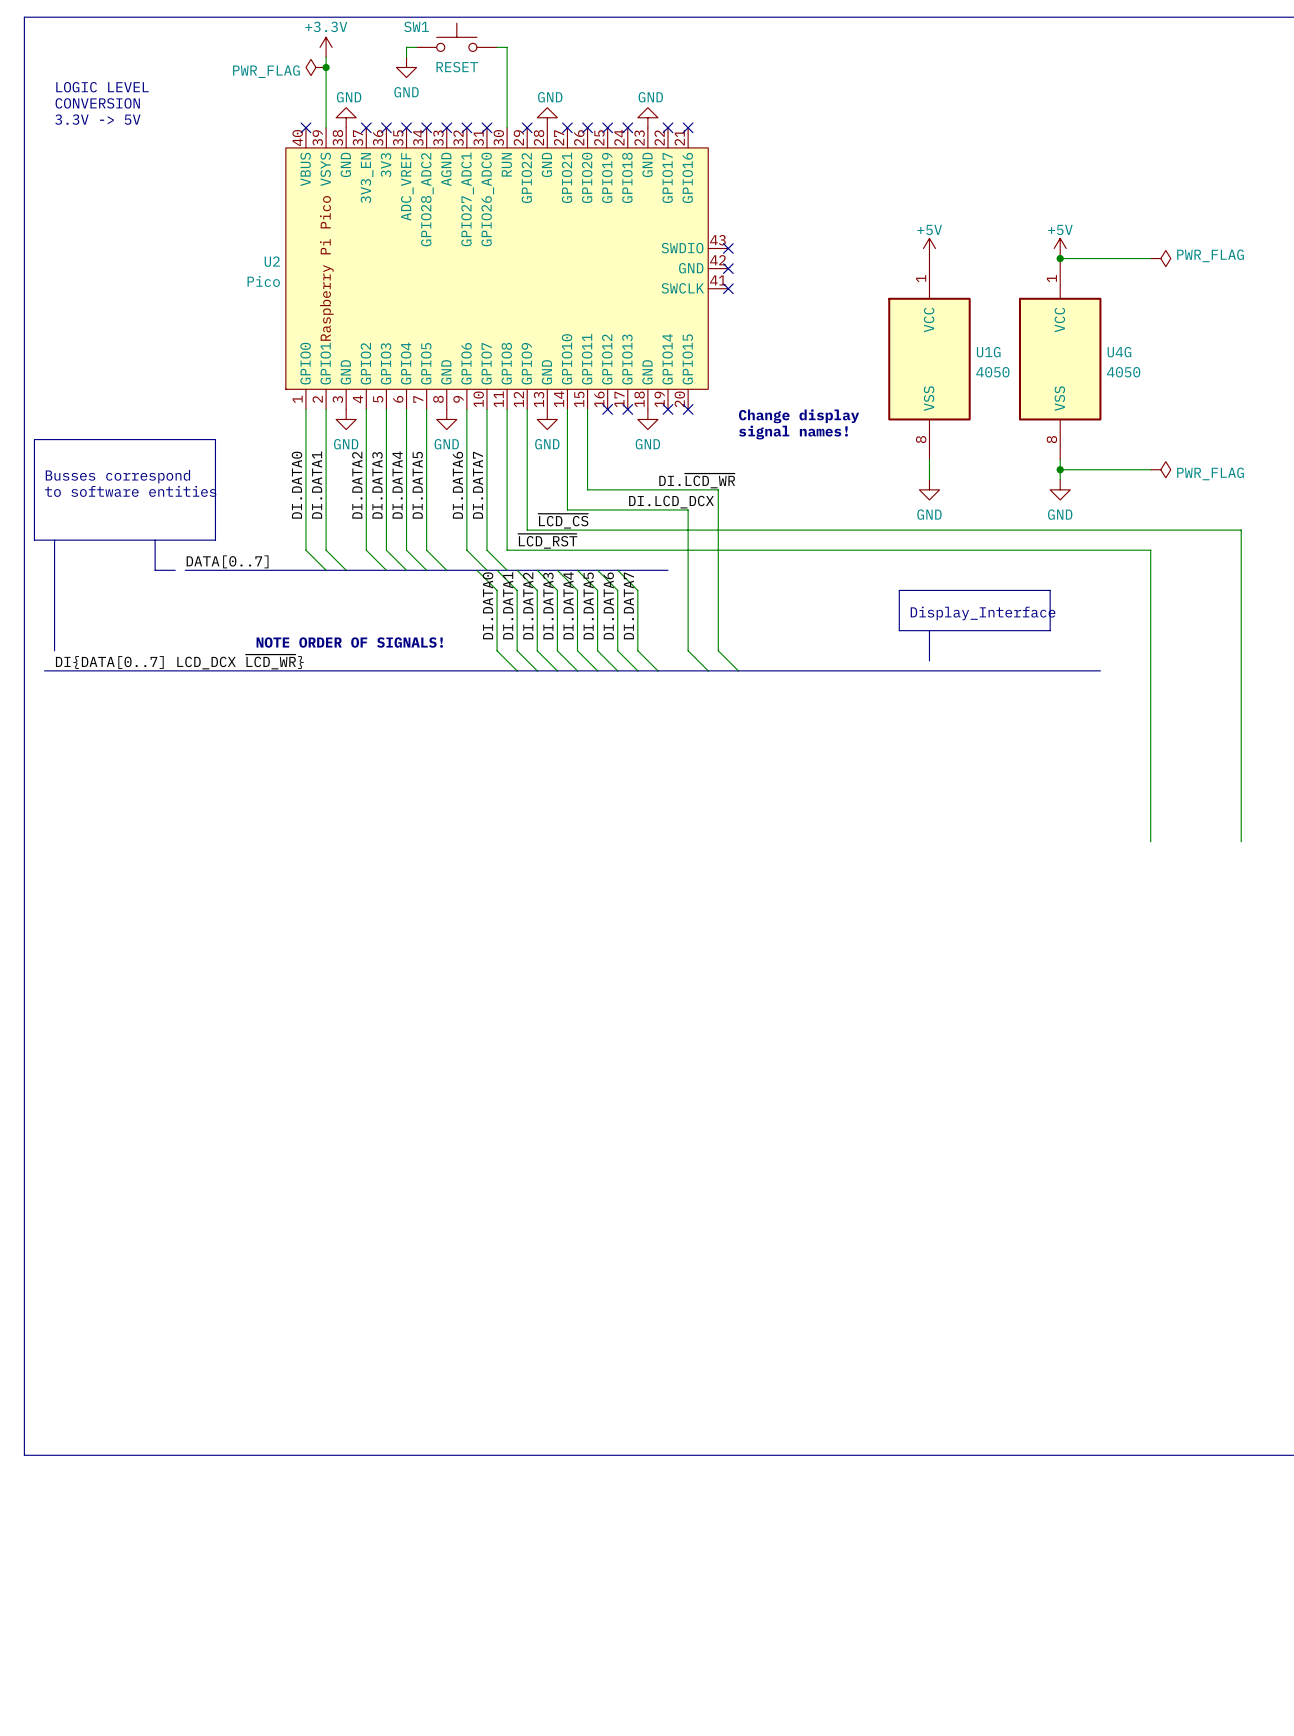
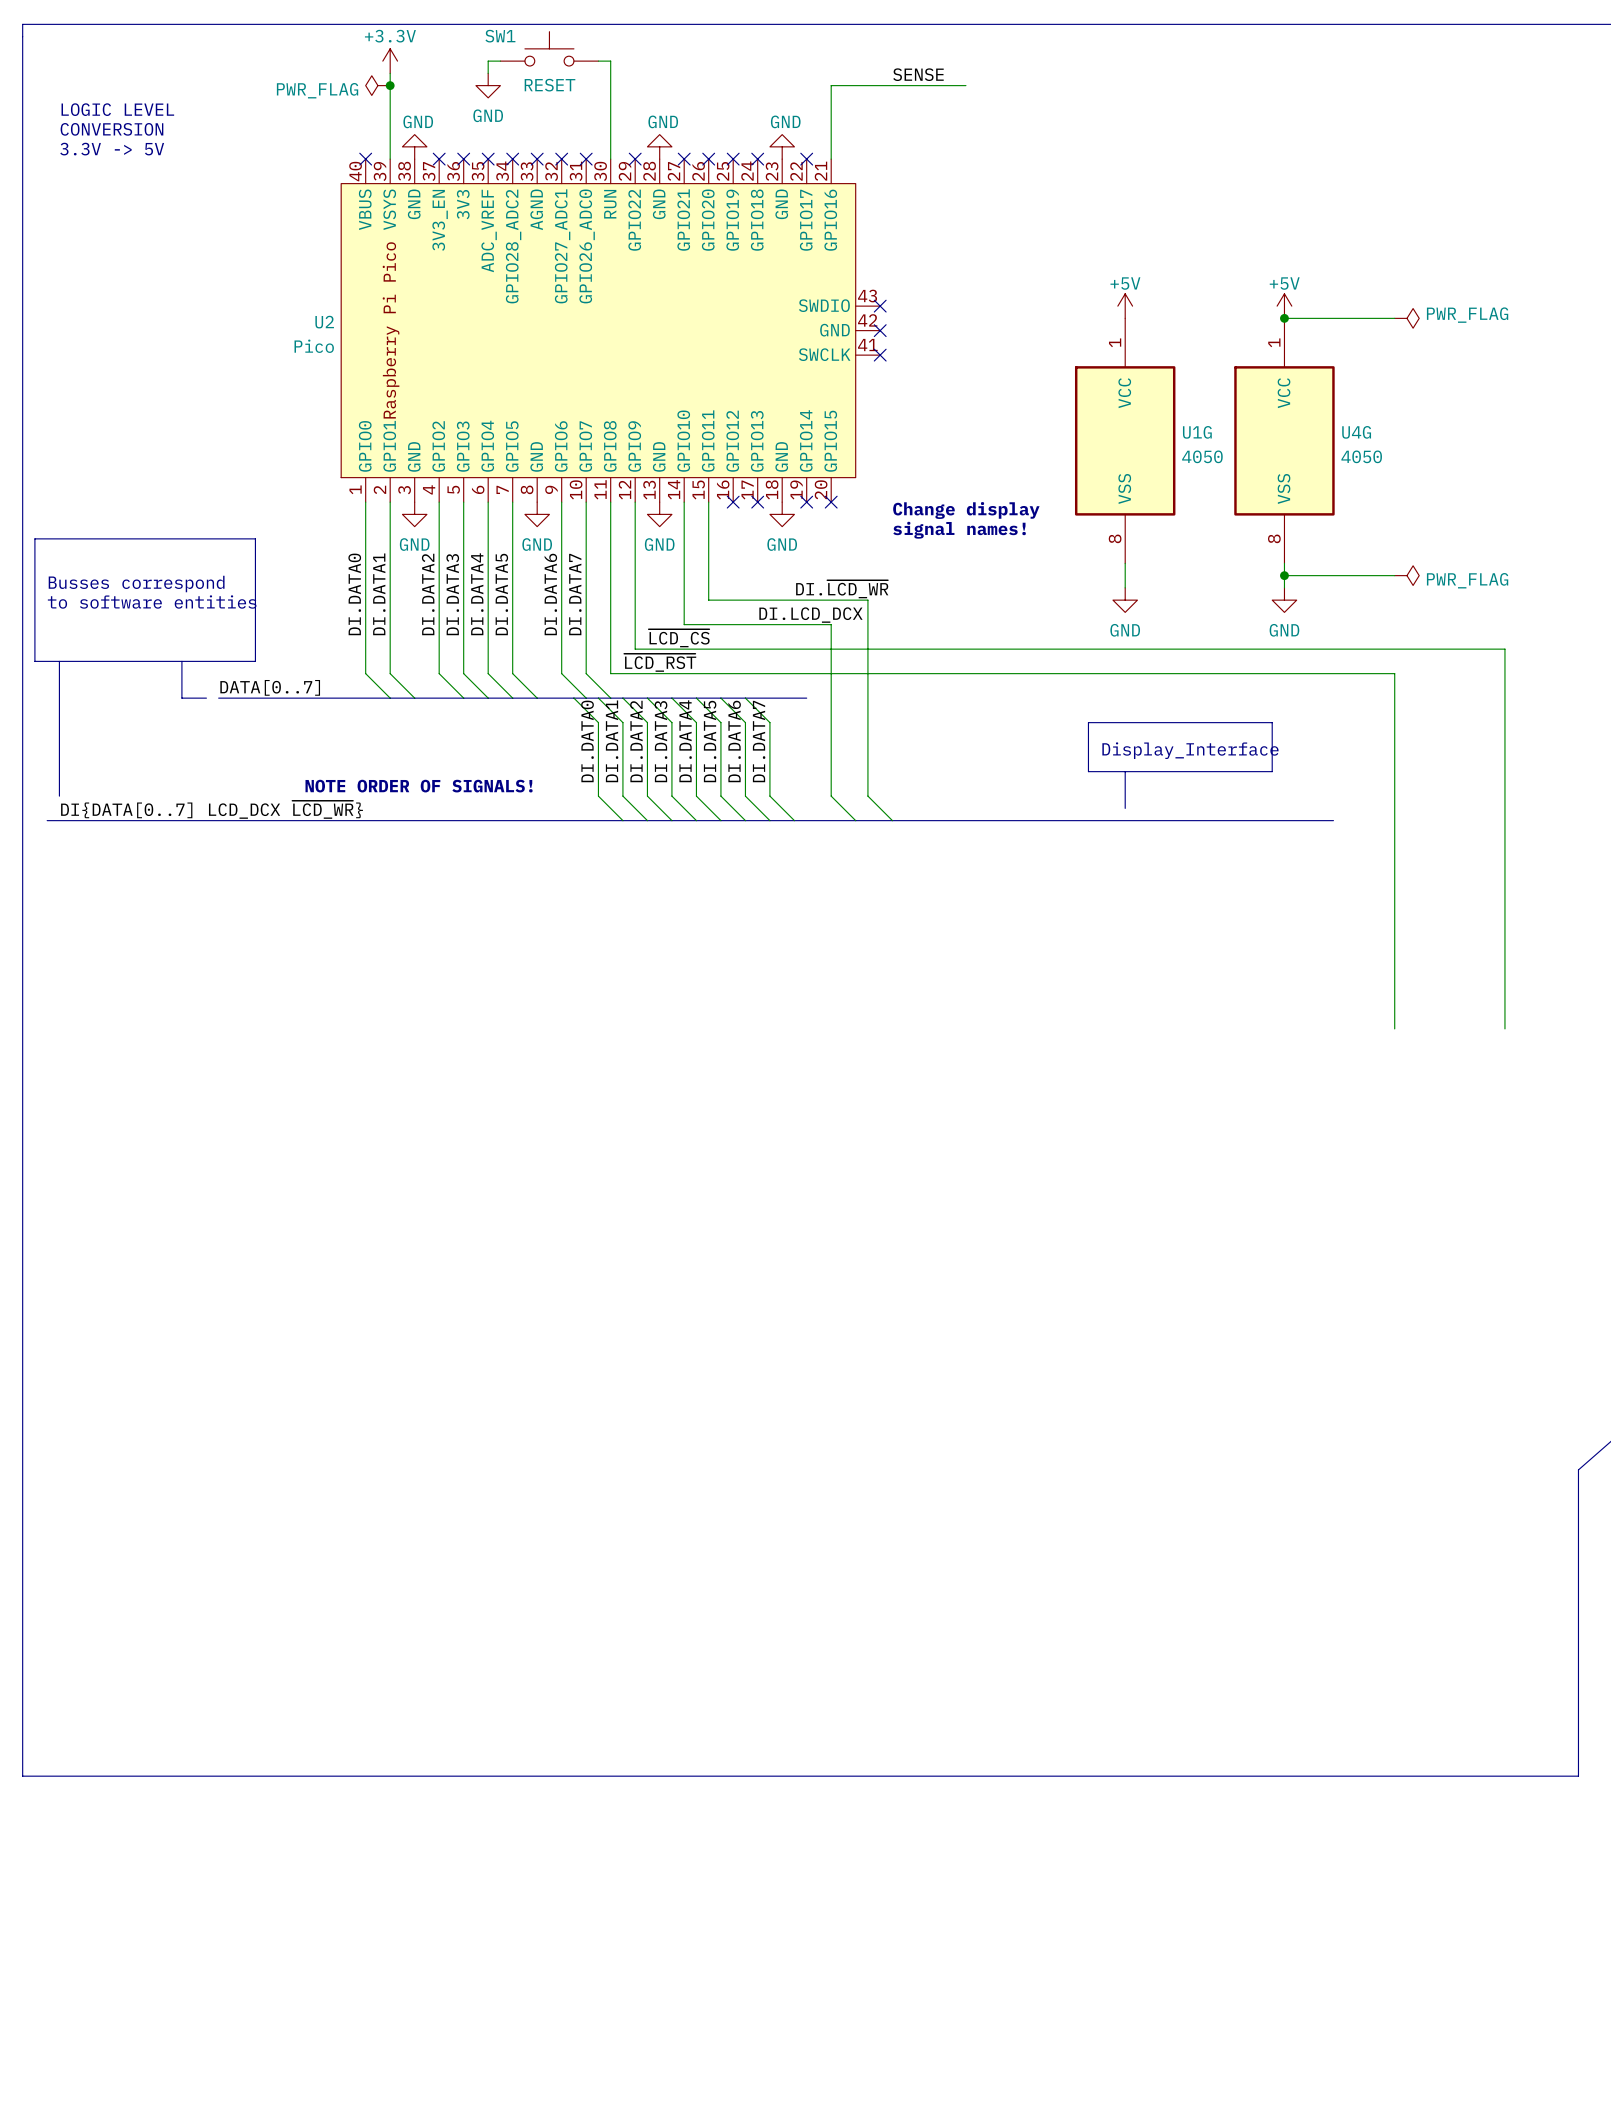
label: none -> SENSE (918, 74)
wire: none -> (965, 85) (831, 85) (831, 159)
no-connect mark: (688, 127) -> none

